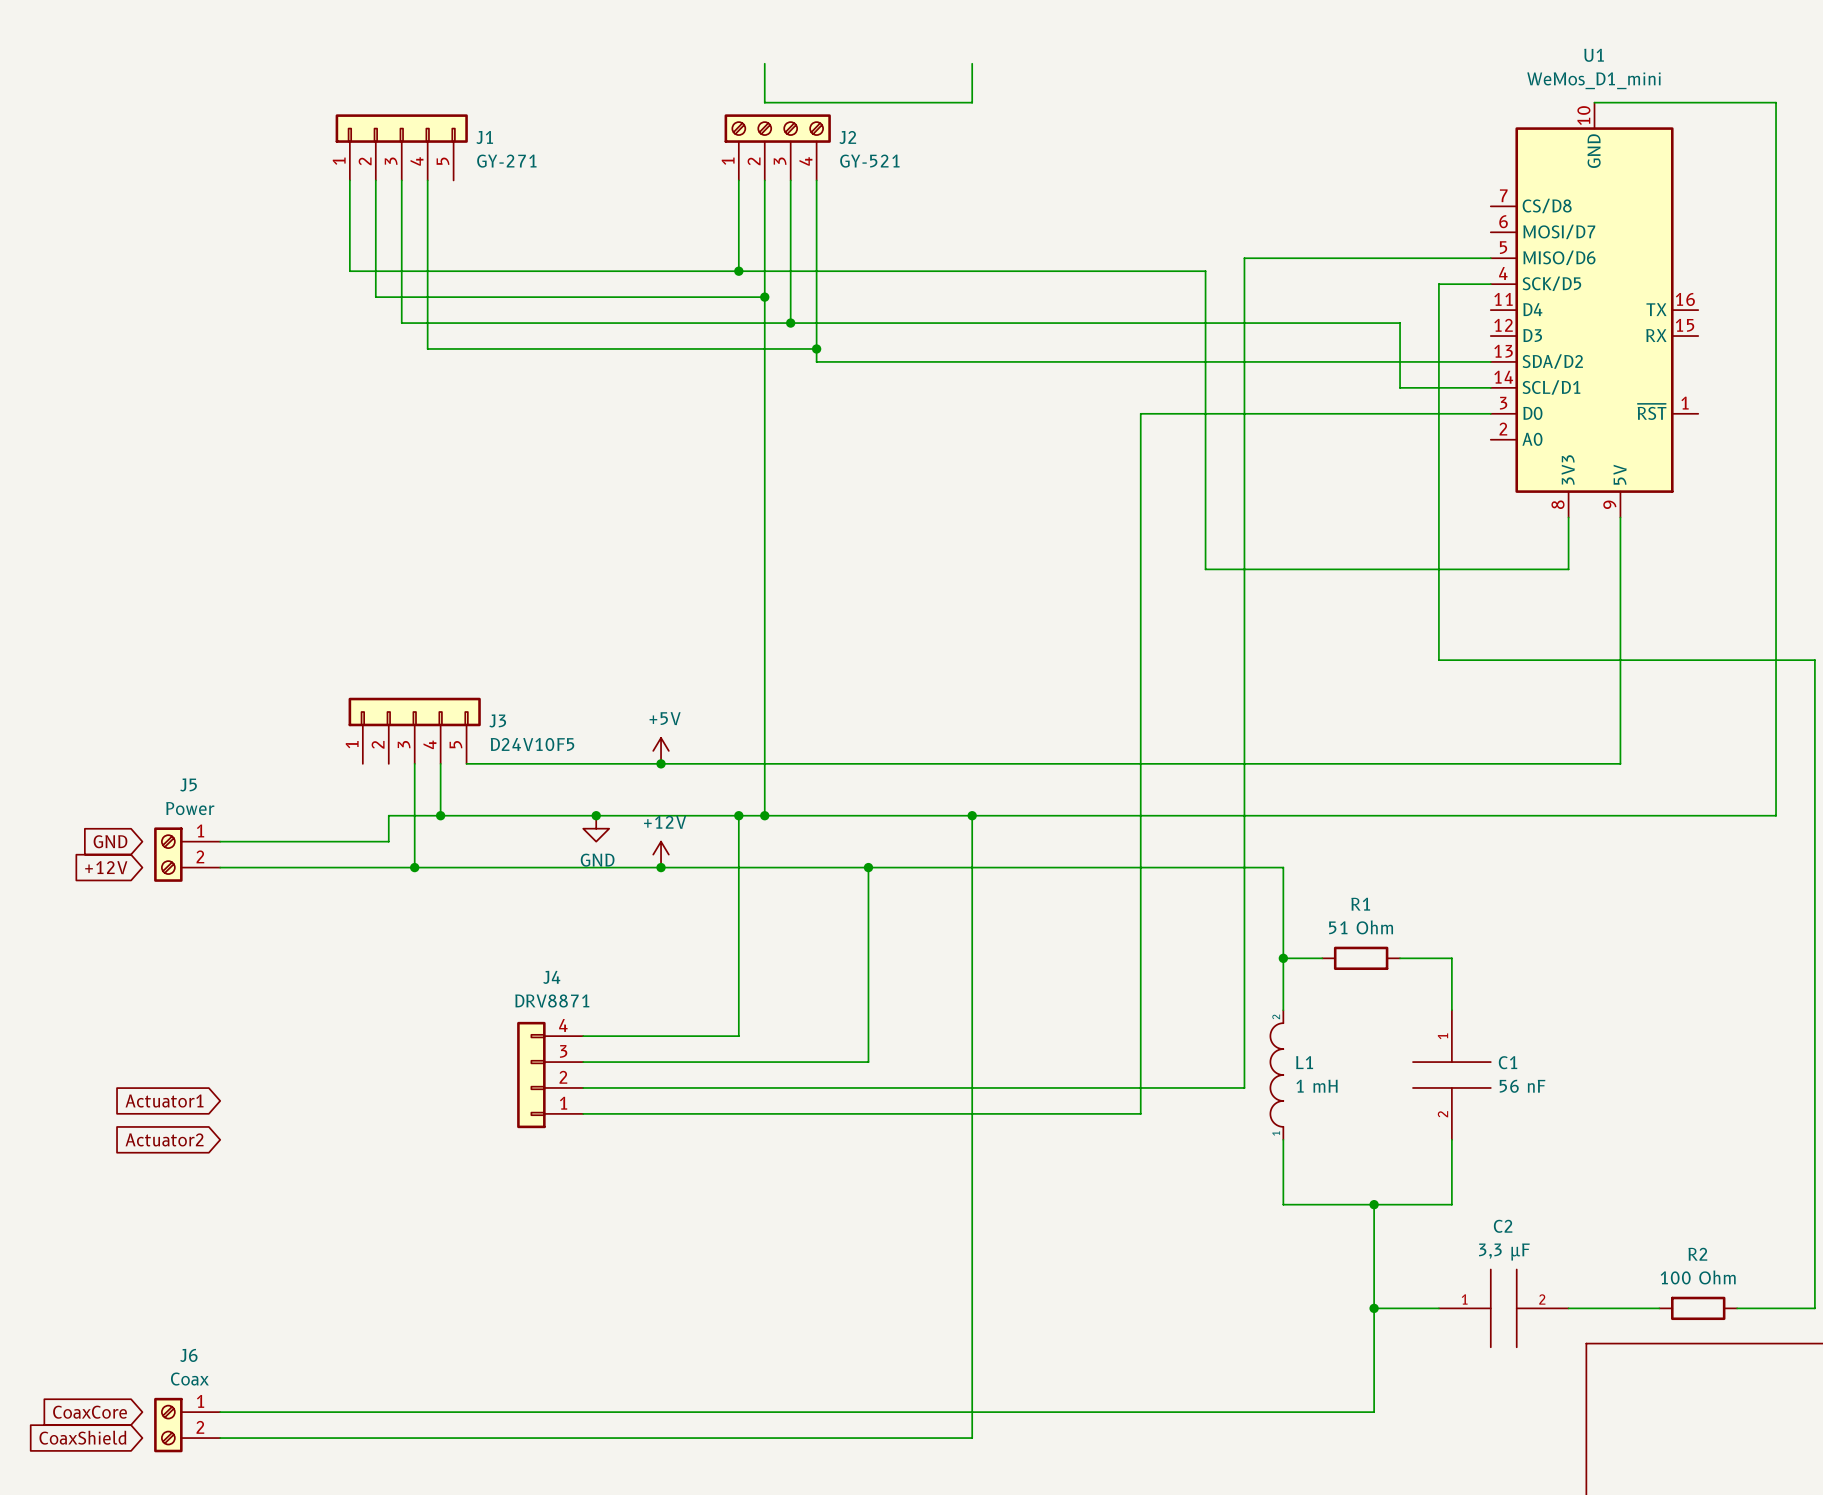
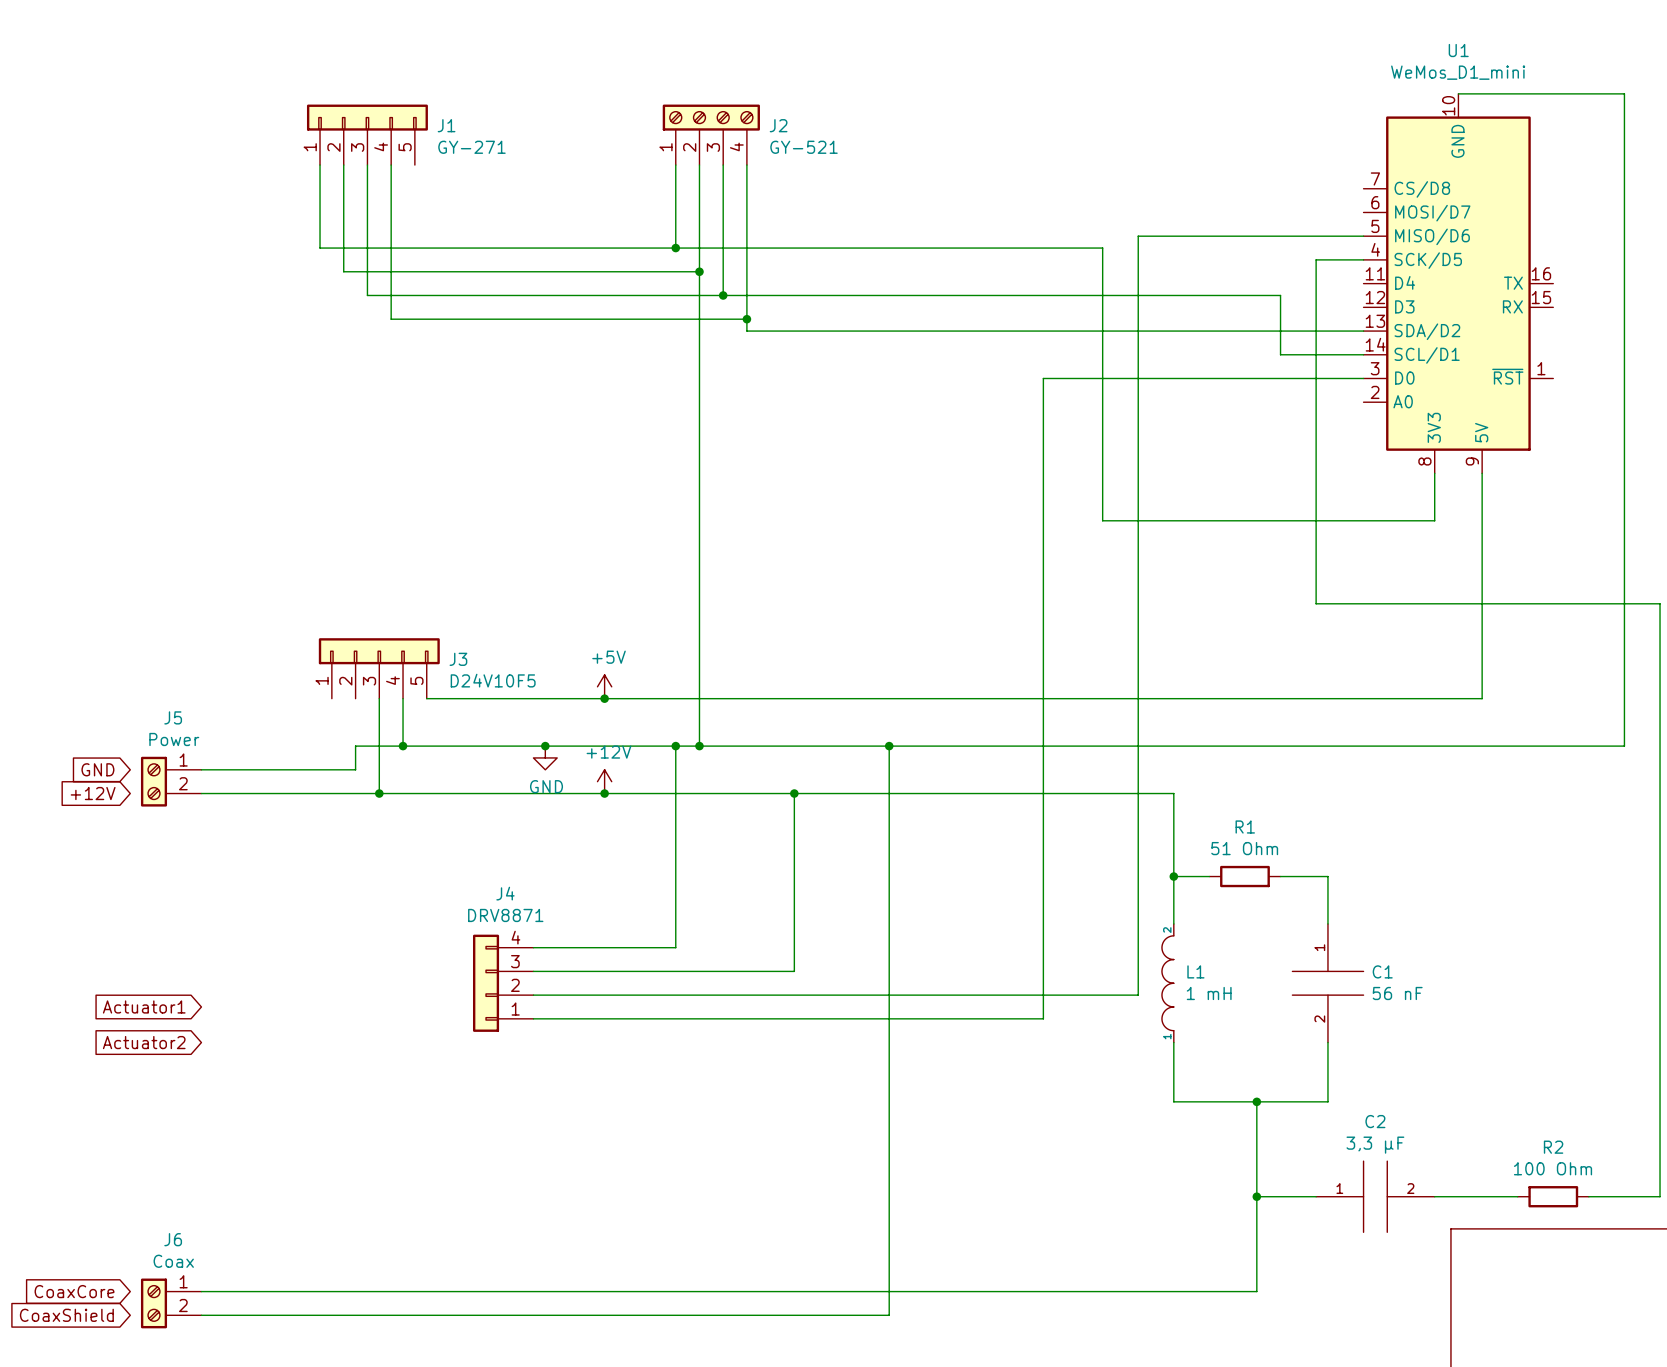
wire: (764, 63) (764, 102) (972, 102) (972, 63) -> none

